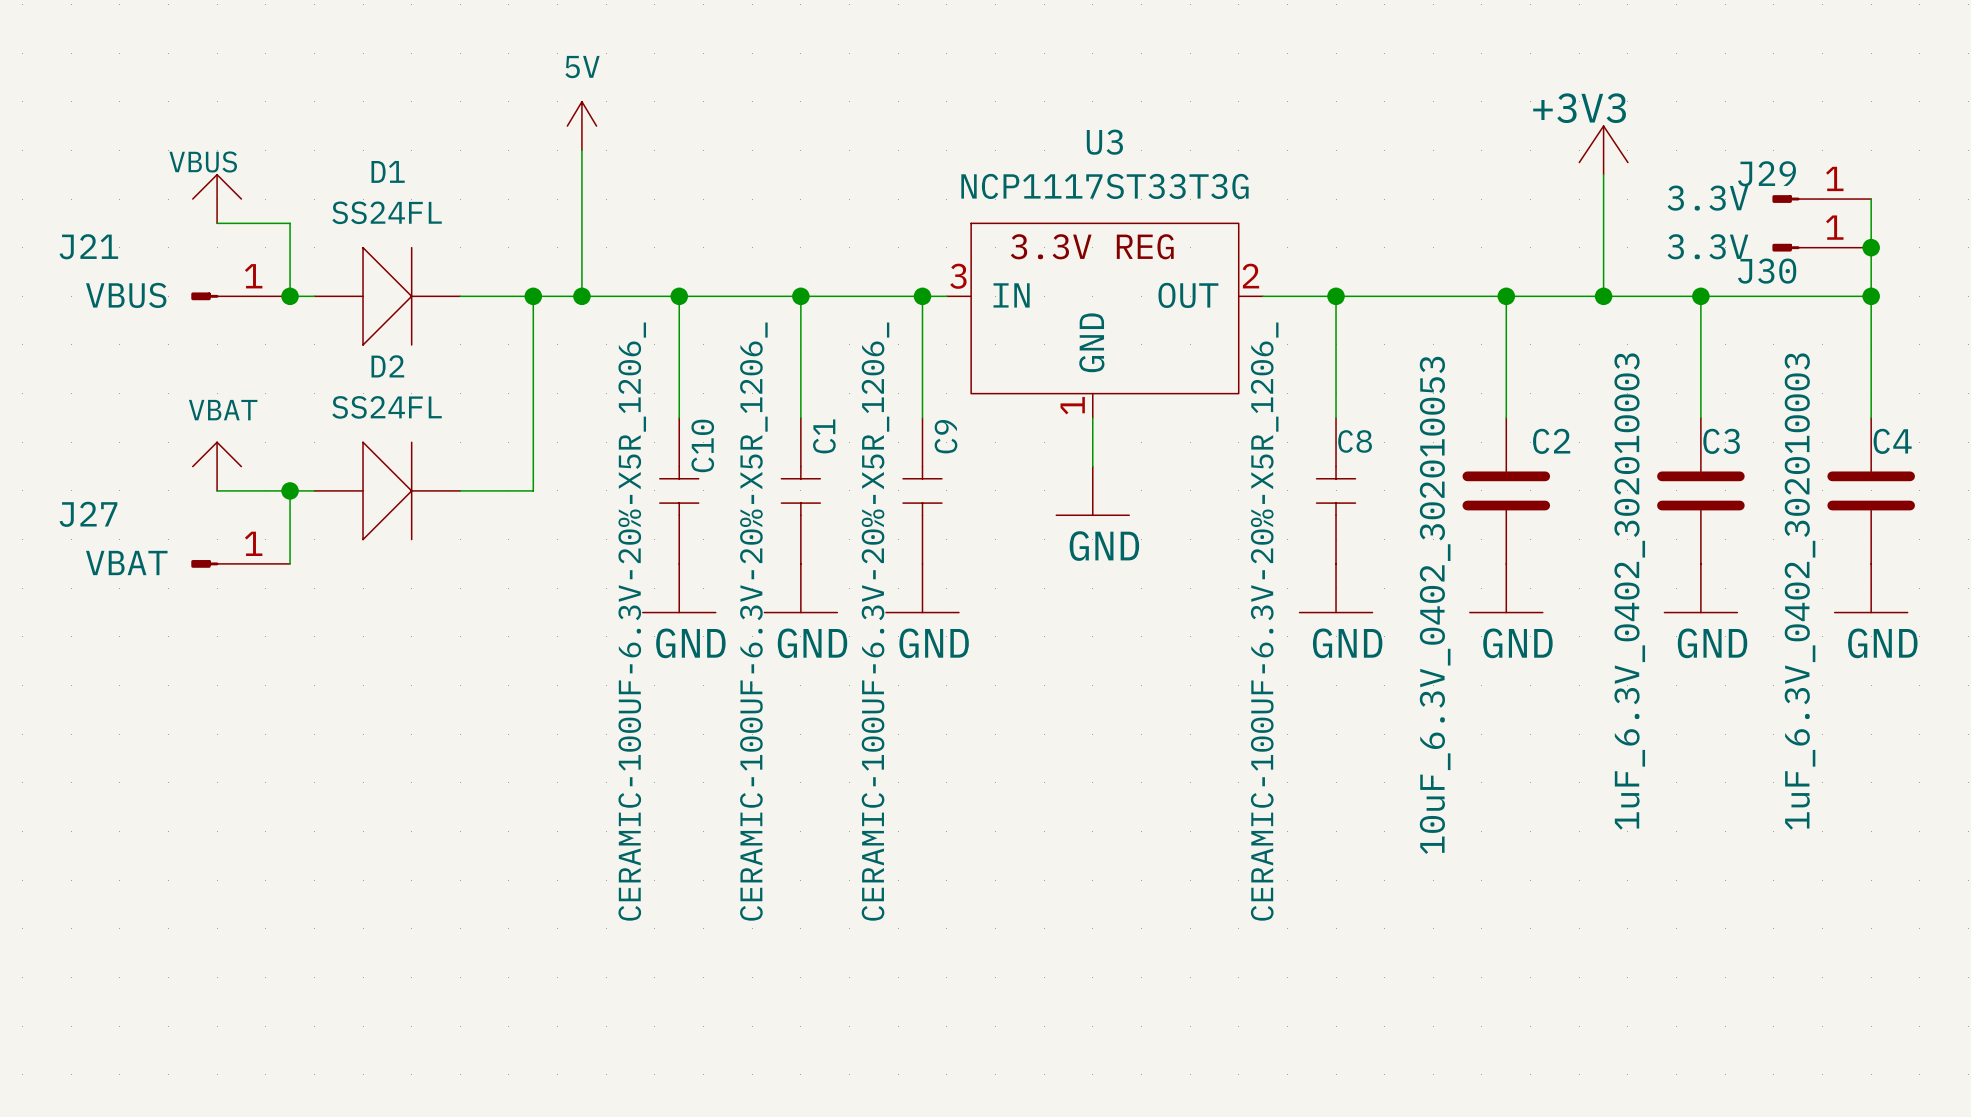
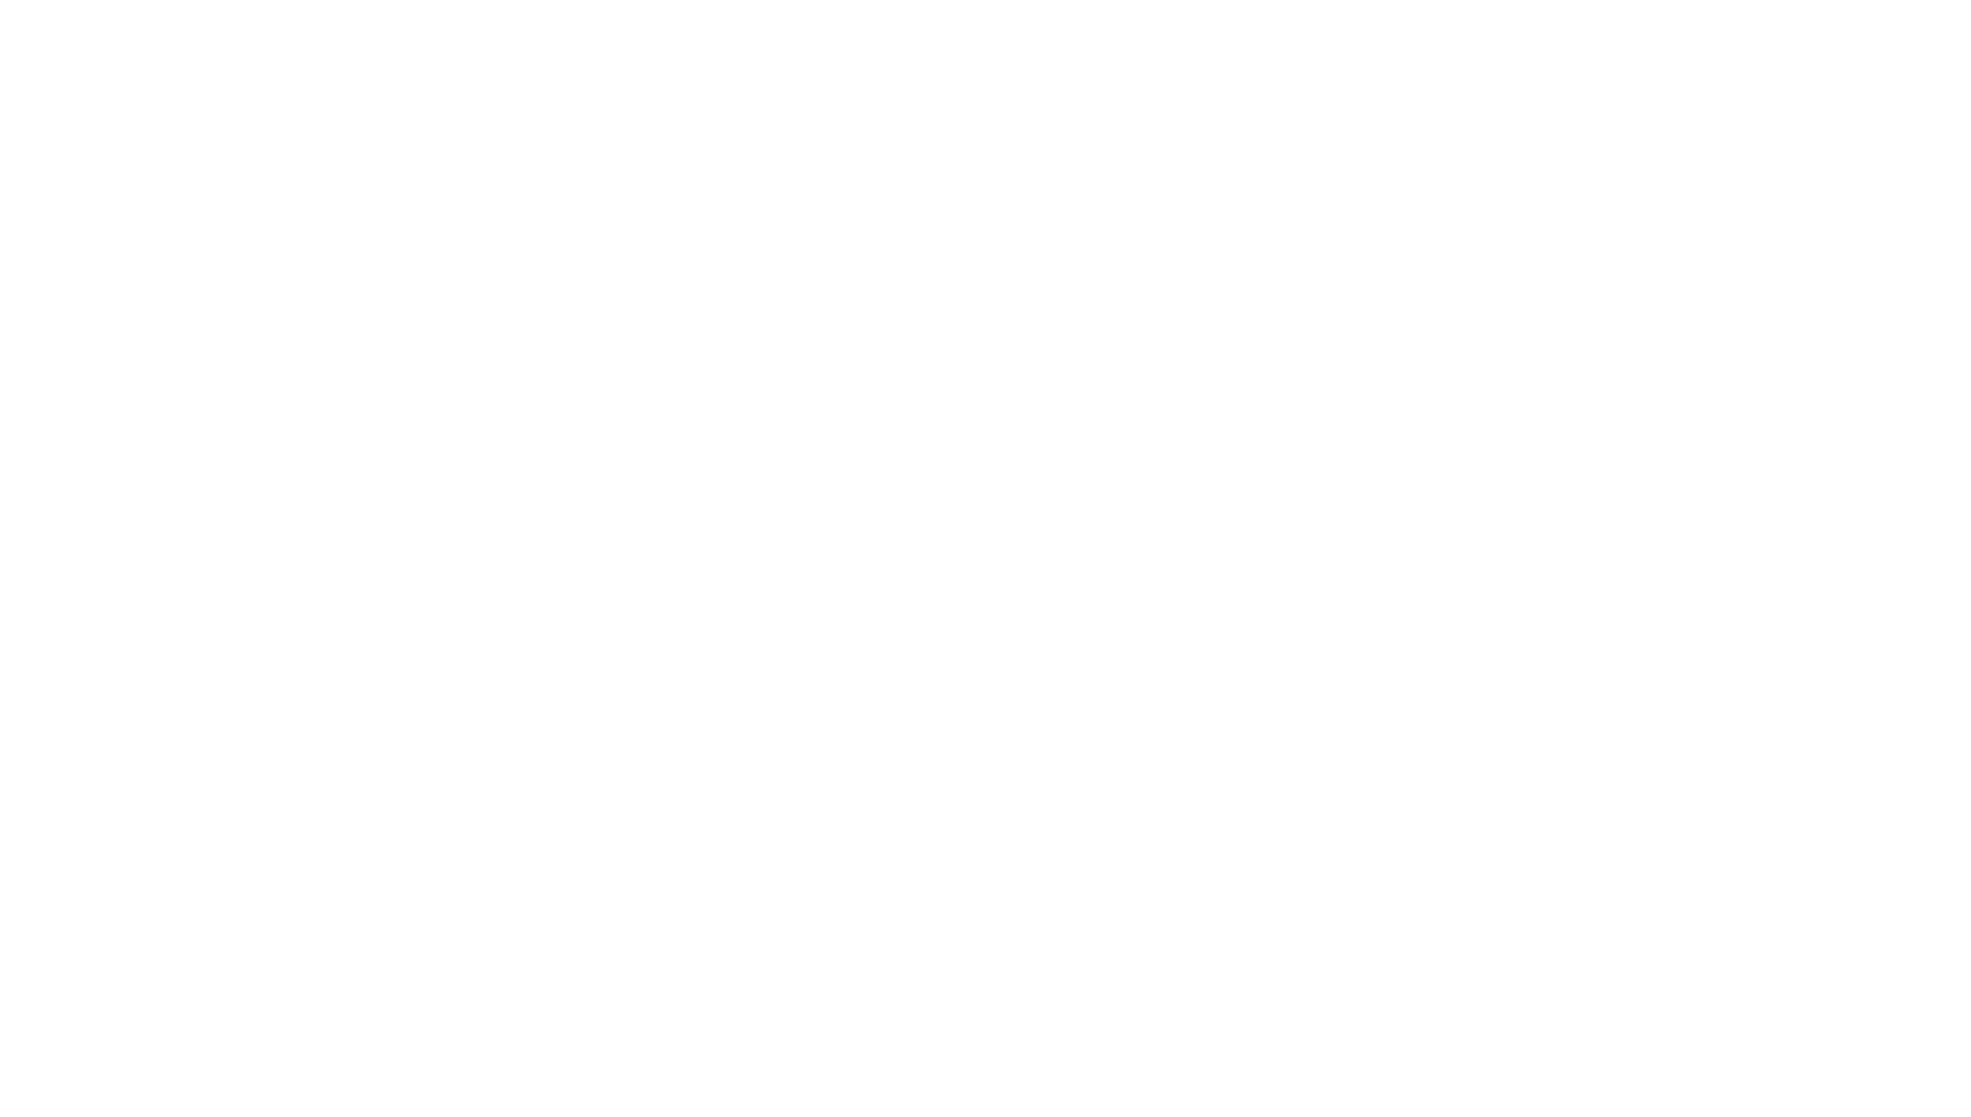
power symbol: 5V (581, 126) -> none
wire: (581, 150) (581, 296) -> none
power symbol: +3V3 (1603, 150) -> none
wire: (1603, 174) (1603, 296) -> none
power symbol: VBUS (217, 199) -> none
J29: 3.3V (1821, 199) -> none
wire: (1871, 199) (1871, 417) -> none
wire: (217, 223) (290, 223) (290, 296) (314, 296) -> none
J30: 3.3V (1821, 247) -> none
junction: (1871, 247) -> none
J21: VBUS (240, 296) -> none
junction: (290, 296) -> none
D1: SS24FL (387, 296) -> none
wire: (460, 296) (946, 296) -> none
wire: (533, 296) (533, 490) (460, 490) -> none
junction: (533, 296) -> none
junction: (581, 296) -> none
wire: (679, 296) (679, 417) -> none
junction: (679, 296) -> none
wire: (800, 296) (800, 417) -> none
junction: (800, 296) -> none
wire: (922, 296) (922, 417) -> none
junction: (922, 296) -> none
wire: (1263, 296) (1871, 296) -> none
wire: (1336, 296) (1336, 417) -> none
junction: (1336, 296) -> none
wire: (1506, 296) (1506, 417) -> none
junction: (1506, 296) -> none
junction: (1603, 296) -> none
wire: (1700, 296) (1700, 417) -> none
junction: (1700, 296) -> none
junction: (1871, 296) -> none
U3: NCP1117ST33T3G (1104, 320) -> none
wire: (1092, 417) (1092, 466) -> none
power symbol: VBAT (217, 466) -> none
wire: (217, 490) (314, 490) -> none
wire: (290, 490) (290, 563) -> none
junction: (290, 490) -> none
D2: SS24FL (387, 490) -> none
C10: CERAMIC-100UF-6.3V-20%-X5R_1206_ (679, 490) -> none
C1: CERAMIC-100UF-6.3V-20%-X5R_1206_ (800, 490) -> none
C9: CERAMIC-100UF-6.3V-20%-X5R_1206_ (922, 490) -> none
power symbol: GND (1092, 490) -> none
C8: CERAMIC-100UF-6.3V-20%-X5R_1206_ (1336, 490) -> none
C2: 10uF_6.3V_0402_302010053 (1506, 490) -> none
C3: 1uF_6.3V_0402_302010003 (1700, 490) -> none
C4: 1uF_6.3V_0402_302010003 (1871, 490) -> none
J27: VBAT (240, 563) -> none
power symbol: GND (679, 588) -> none
power symbol: GND (800, 588) -> none
power symbol: GND (922, 588) -> none
power symbol: GND (1336, 588) -> none
power symbol: GND (1506, 588) -> none
power symbol: GND (1700, 588) -> none
power symbol: GND (1871, 588) -> none

